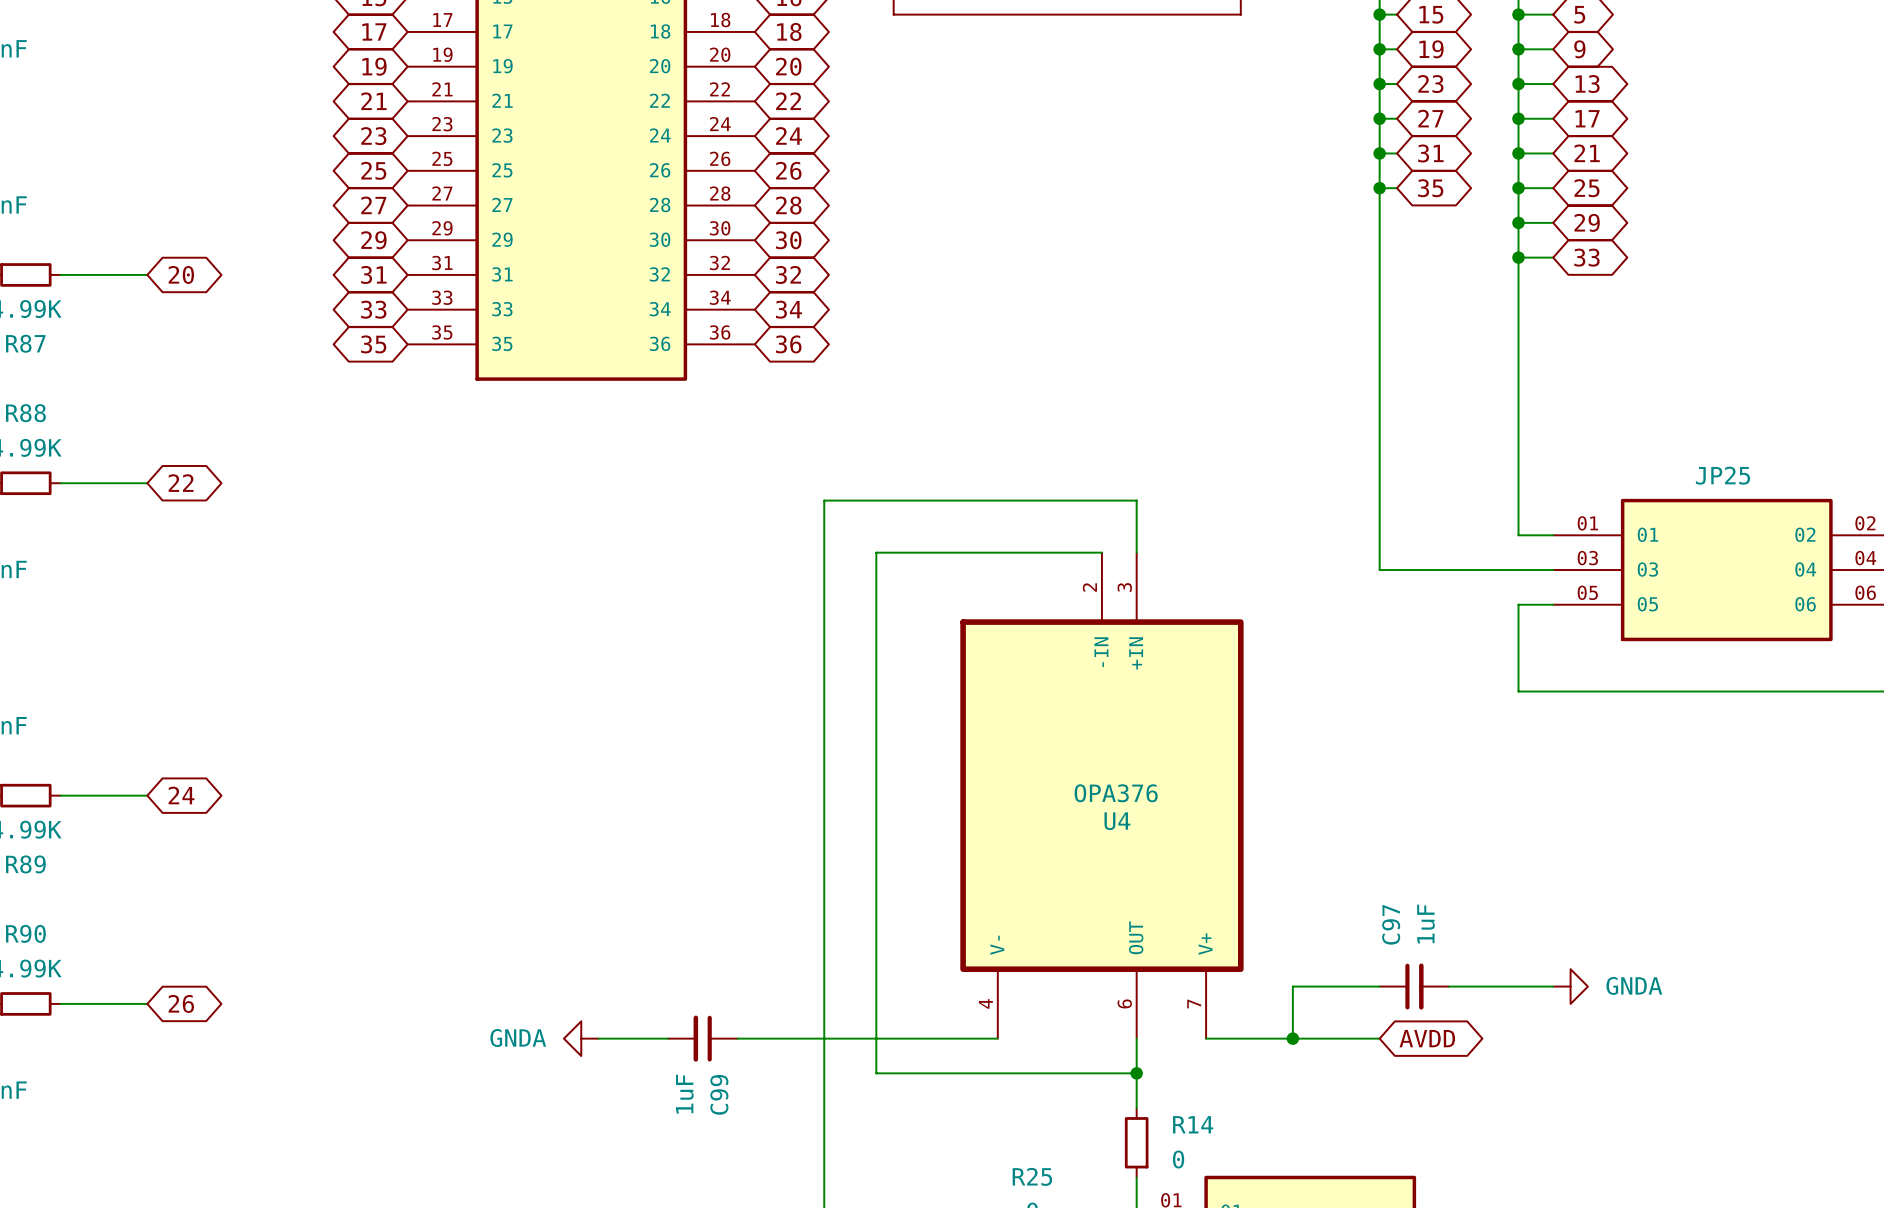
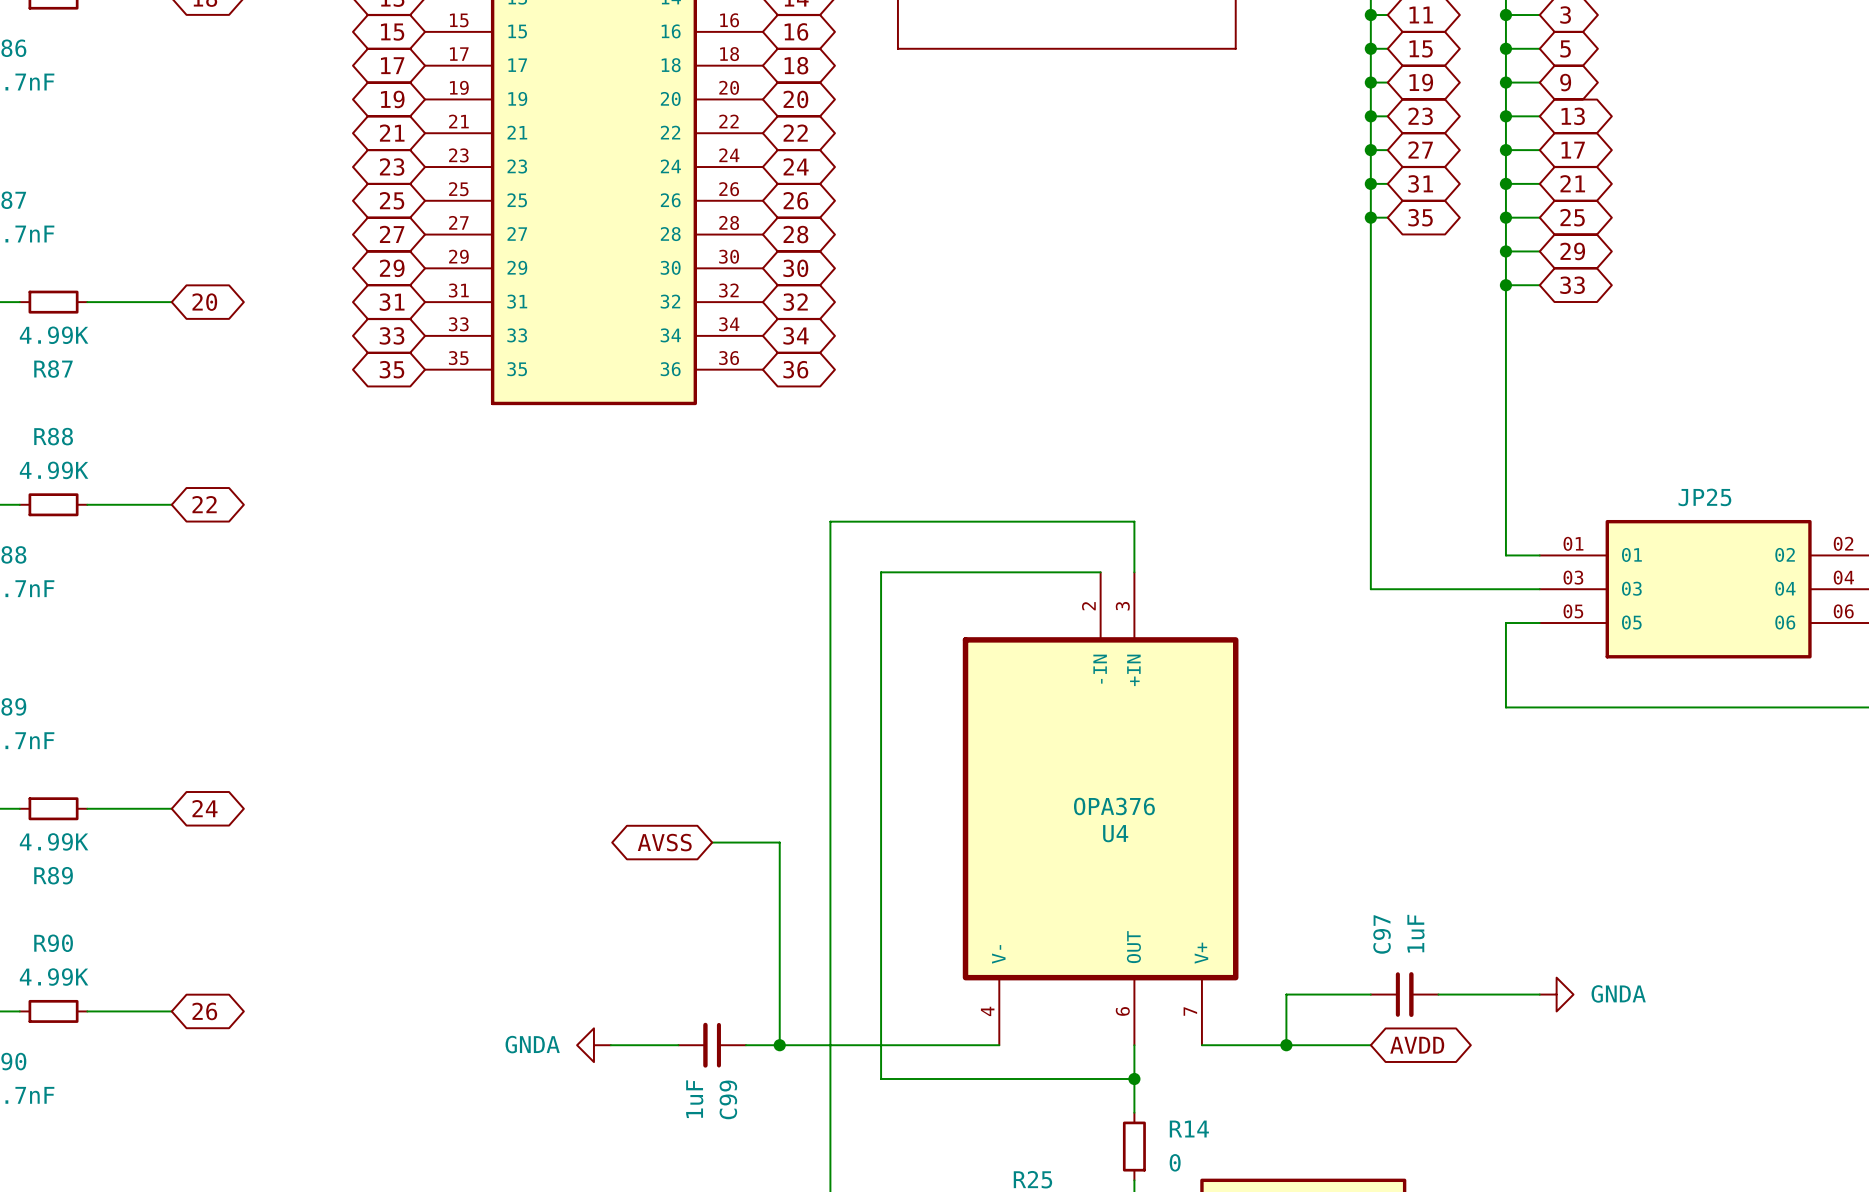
global label: none -> AVSS (664, 842)
wire: none -> (712, 842) (779, 842) (779, 1045)
junction: none -> (779, 1045)

